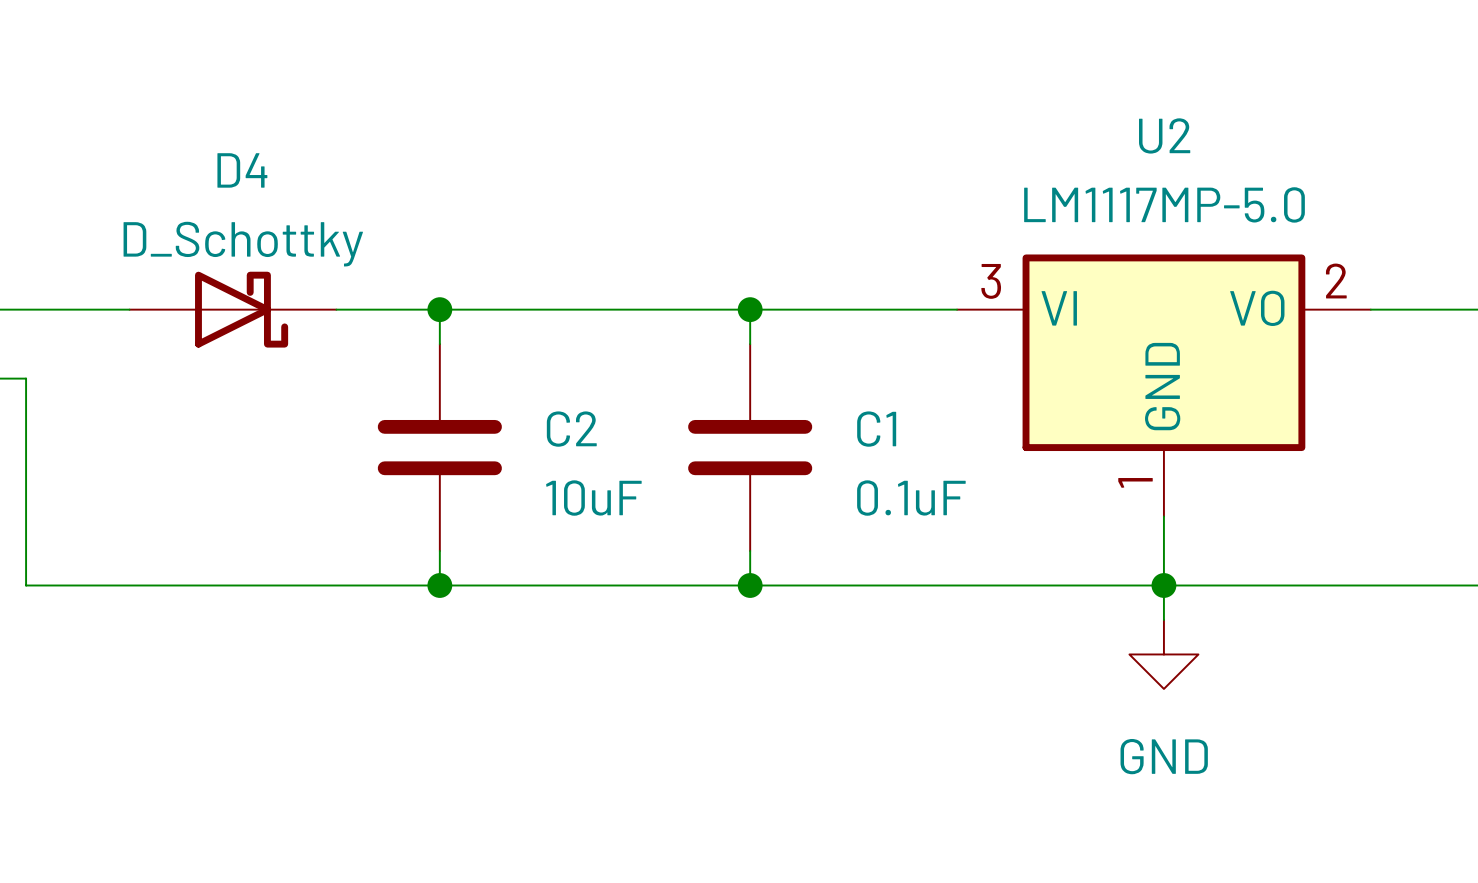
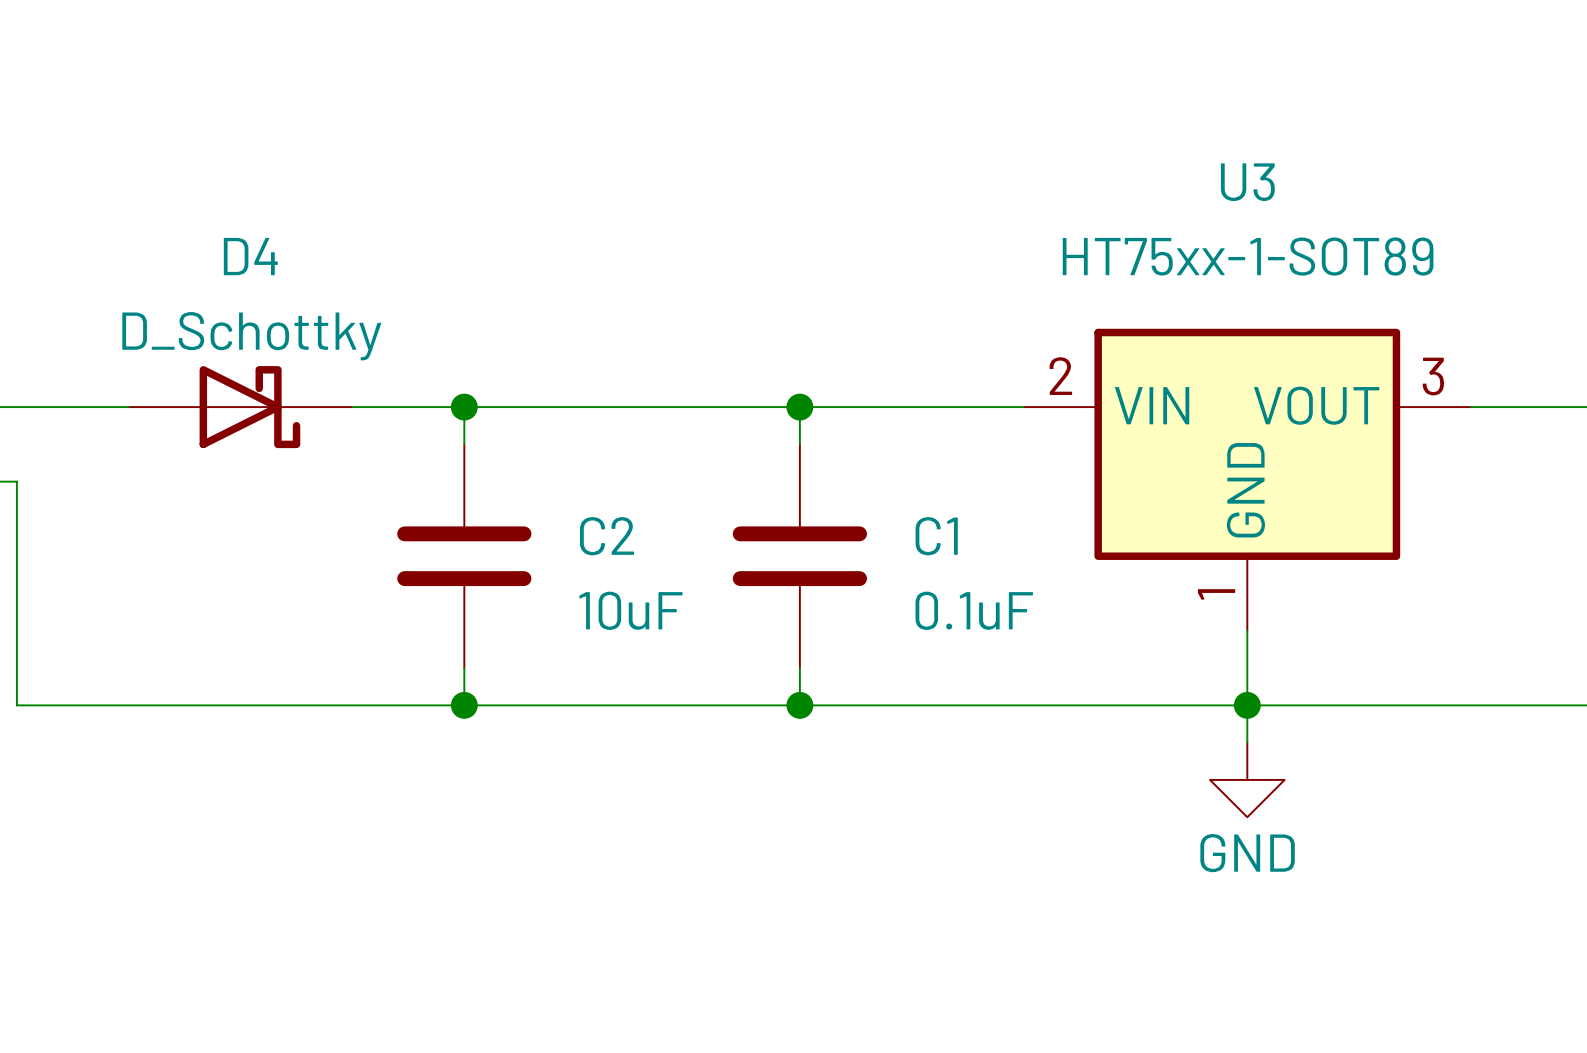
U3: none -> HT75xx-1-SOT89 (1247, 479)
U2: LM1117MP-5.0 (1163, 385) -> none
power symbol text position: GND (1164, 756) -> GND (1247, 853)

